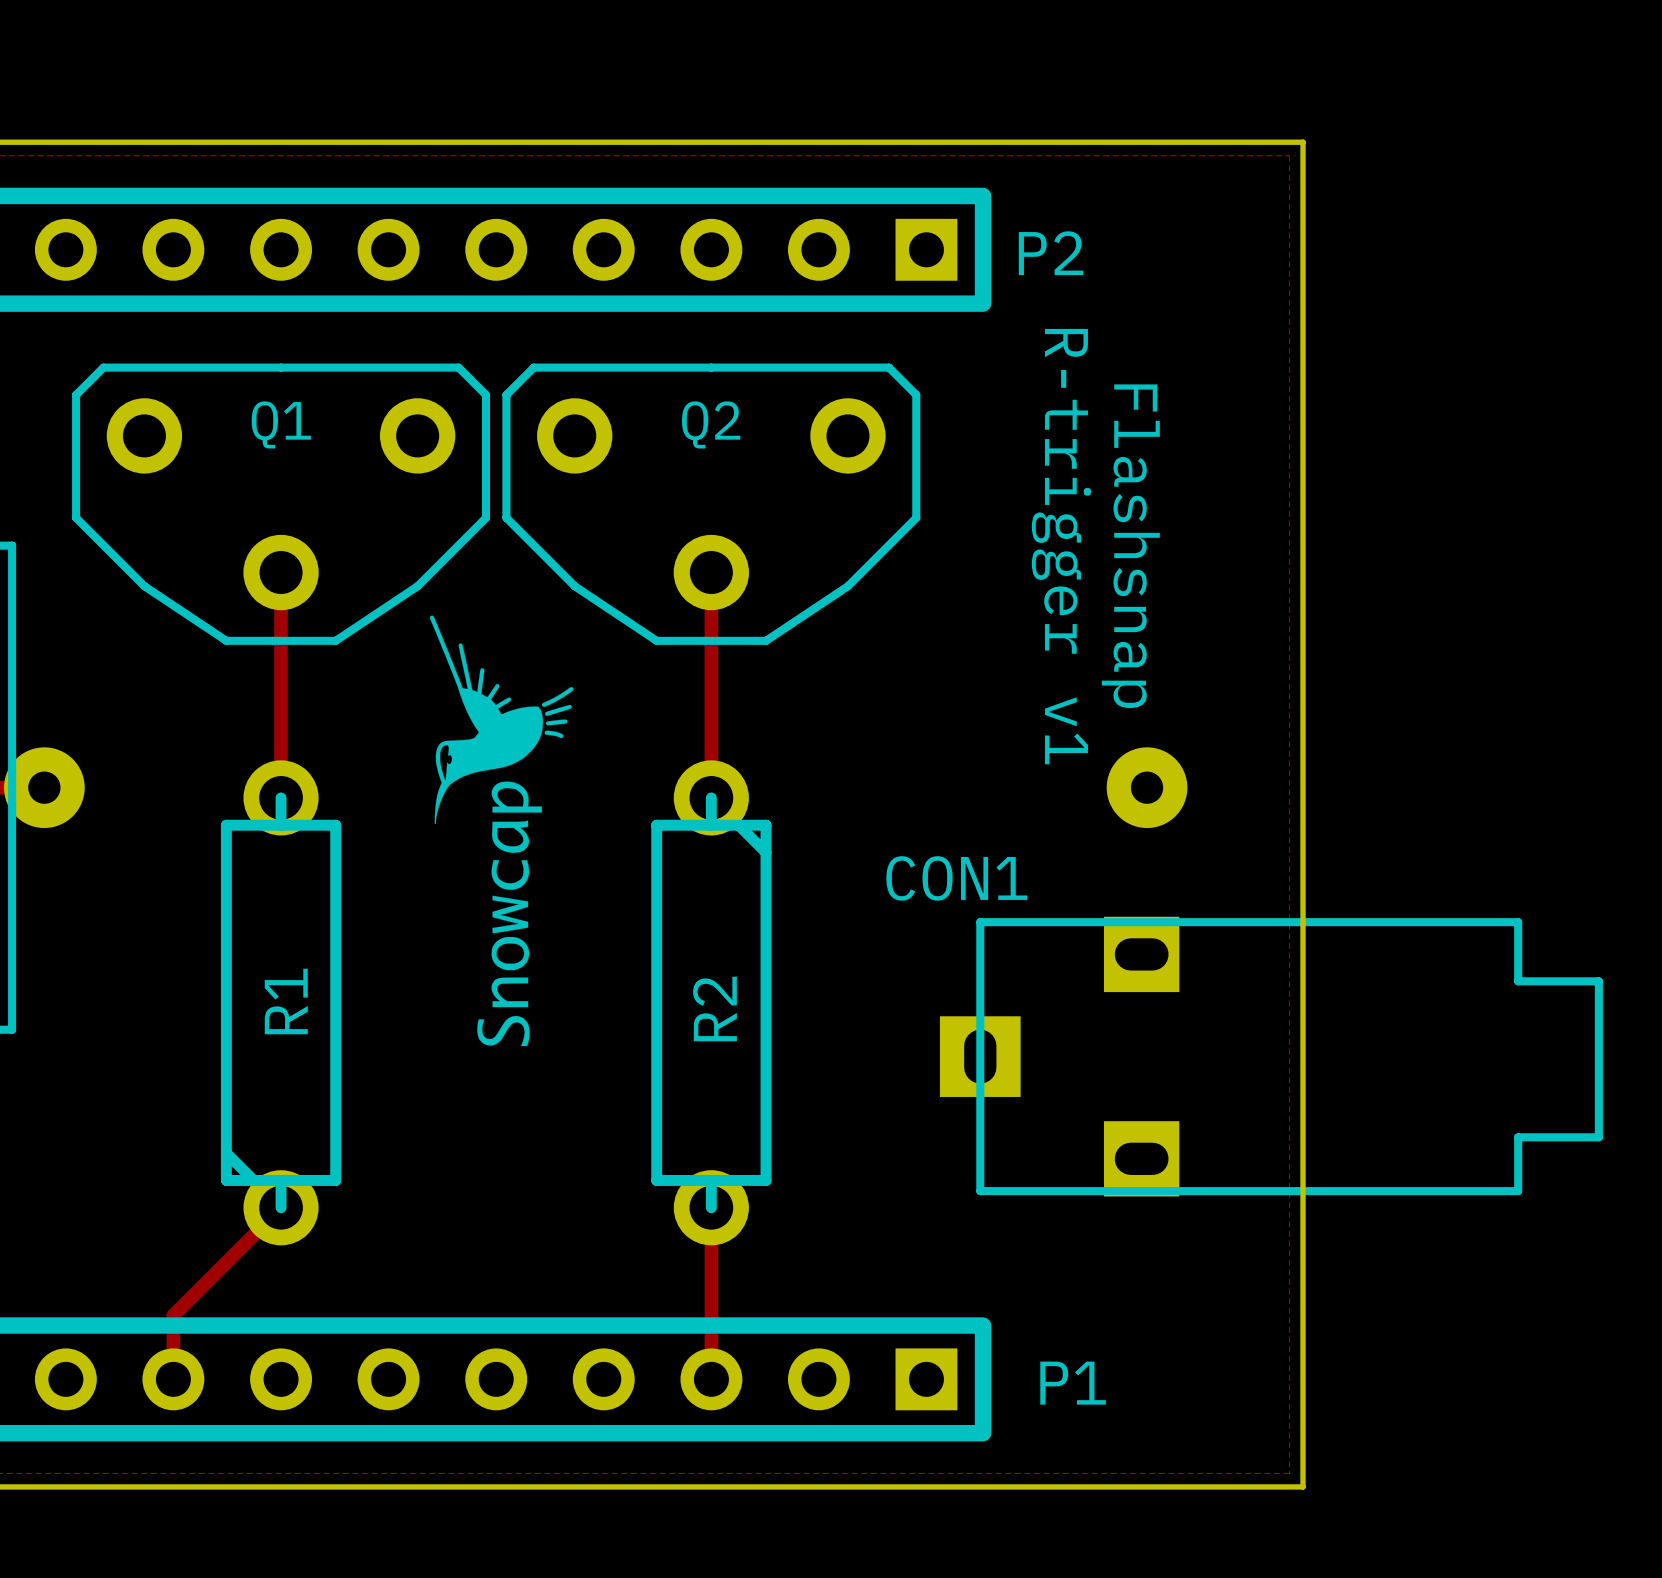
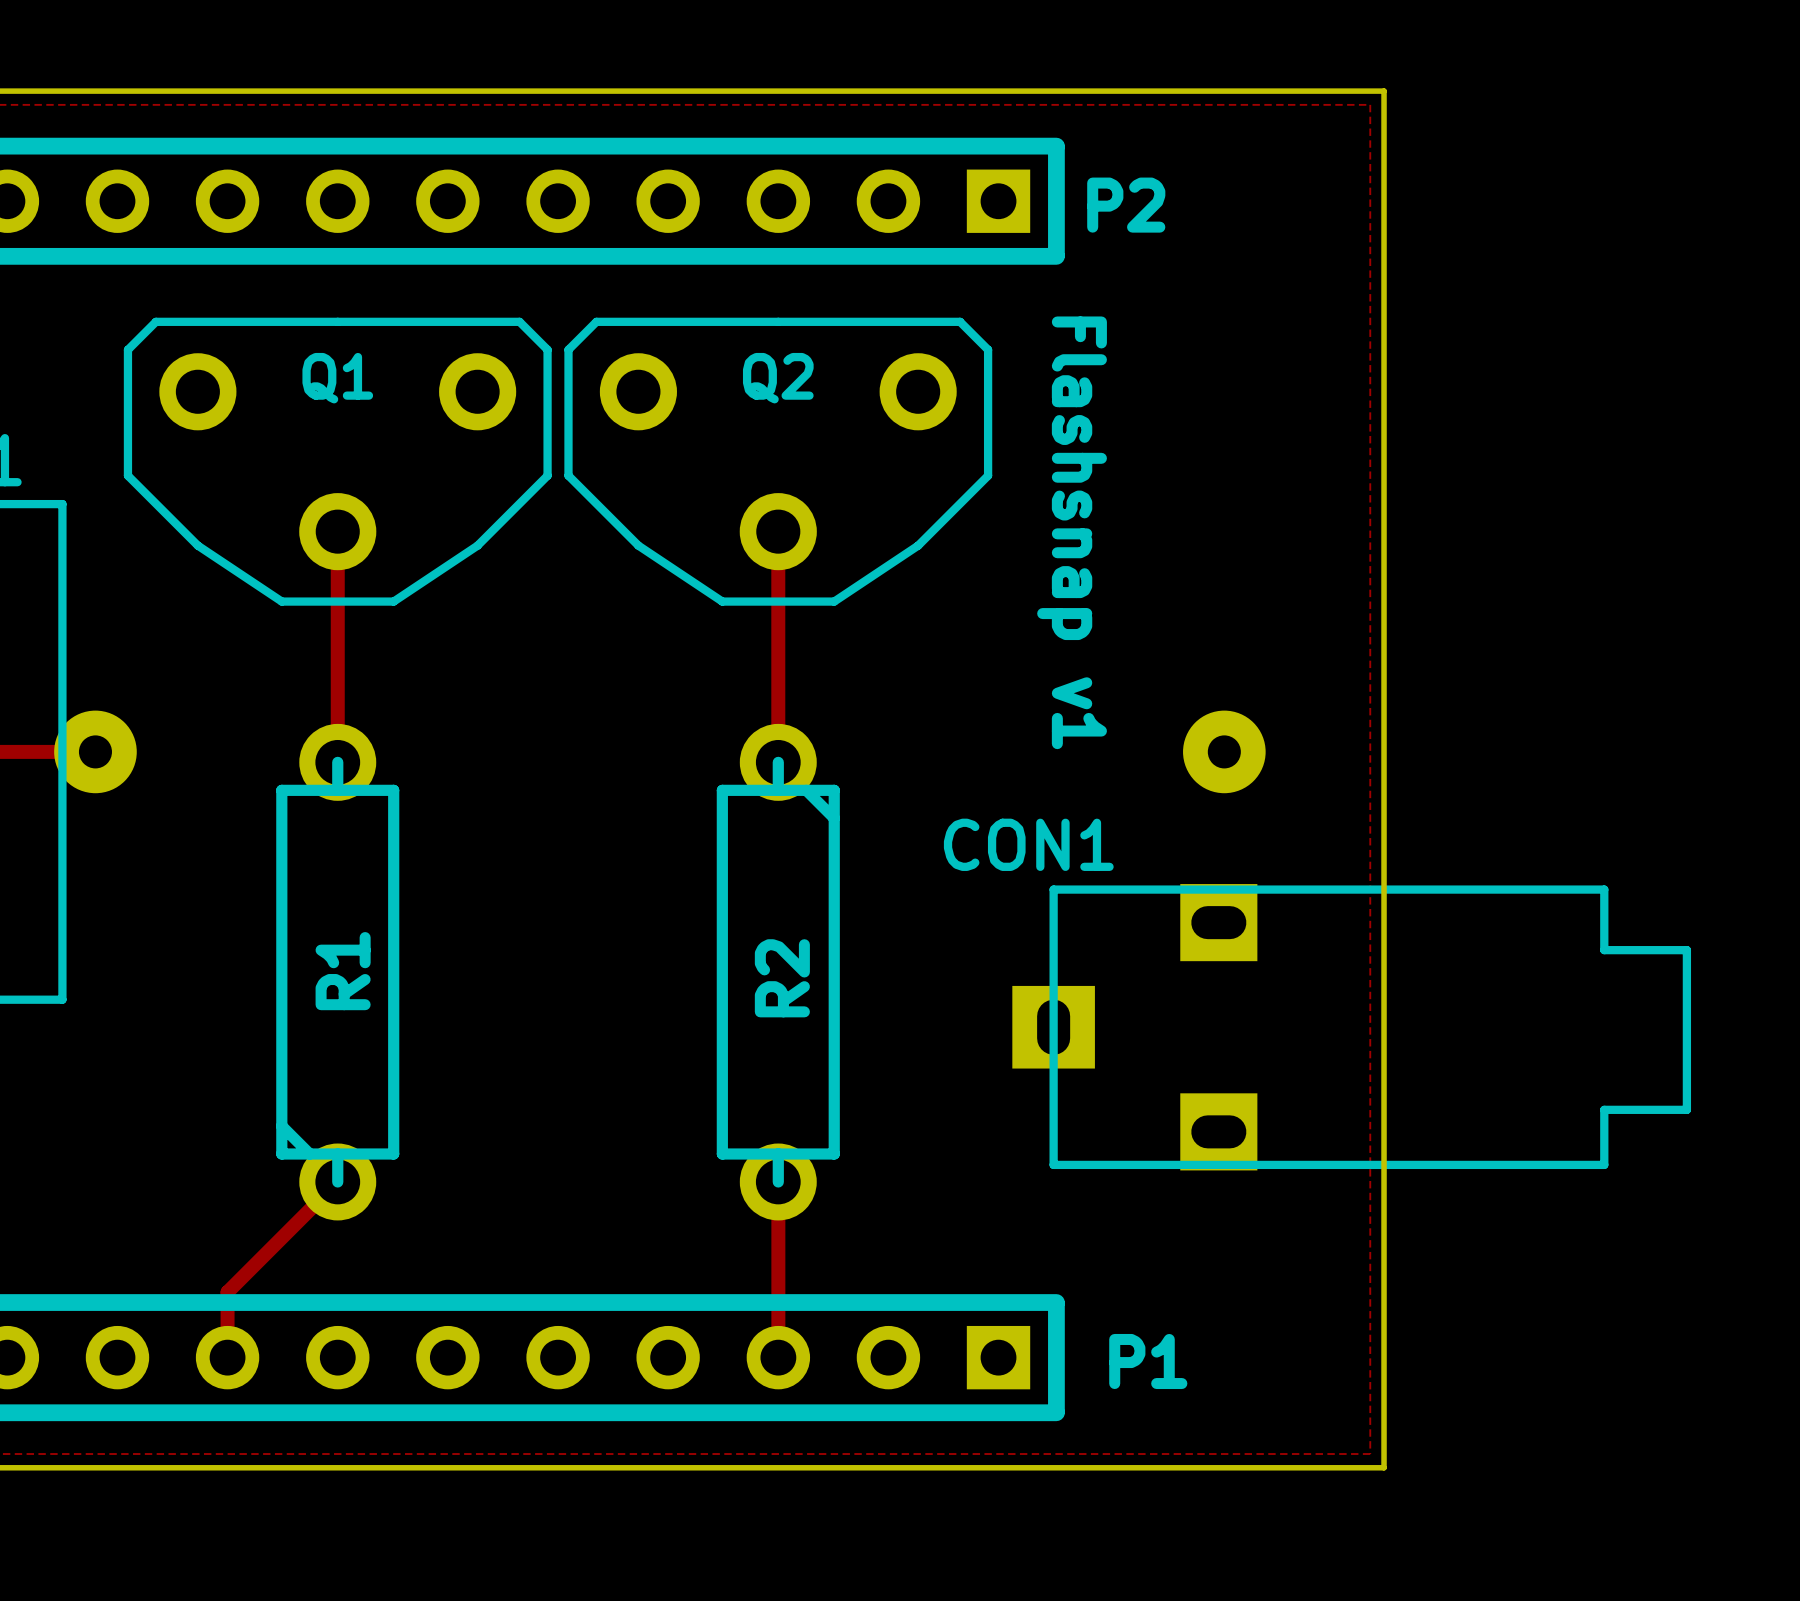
text: R-trigger v1 (1061, 546) -> none
text: Flashsnap (1130, 546) -> none
text: none -> Flashsnap v1 (1072, 532)
drawing: [429, 615, 574, 1047] -> none

